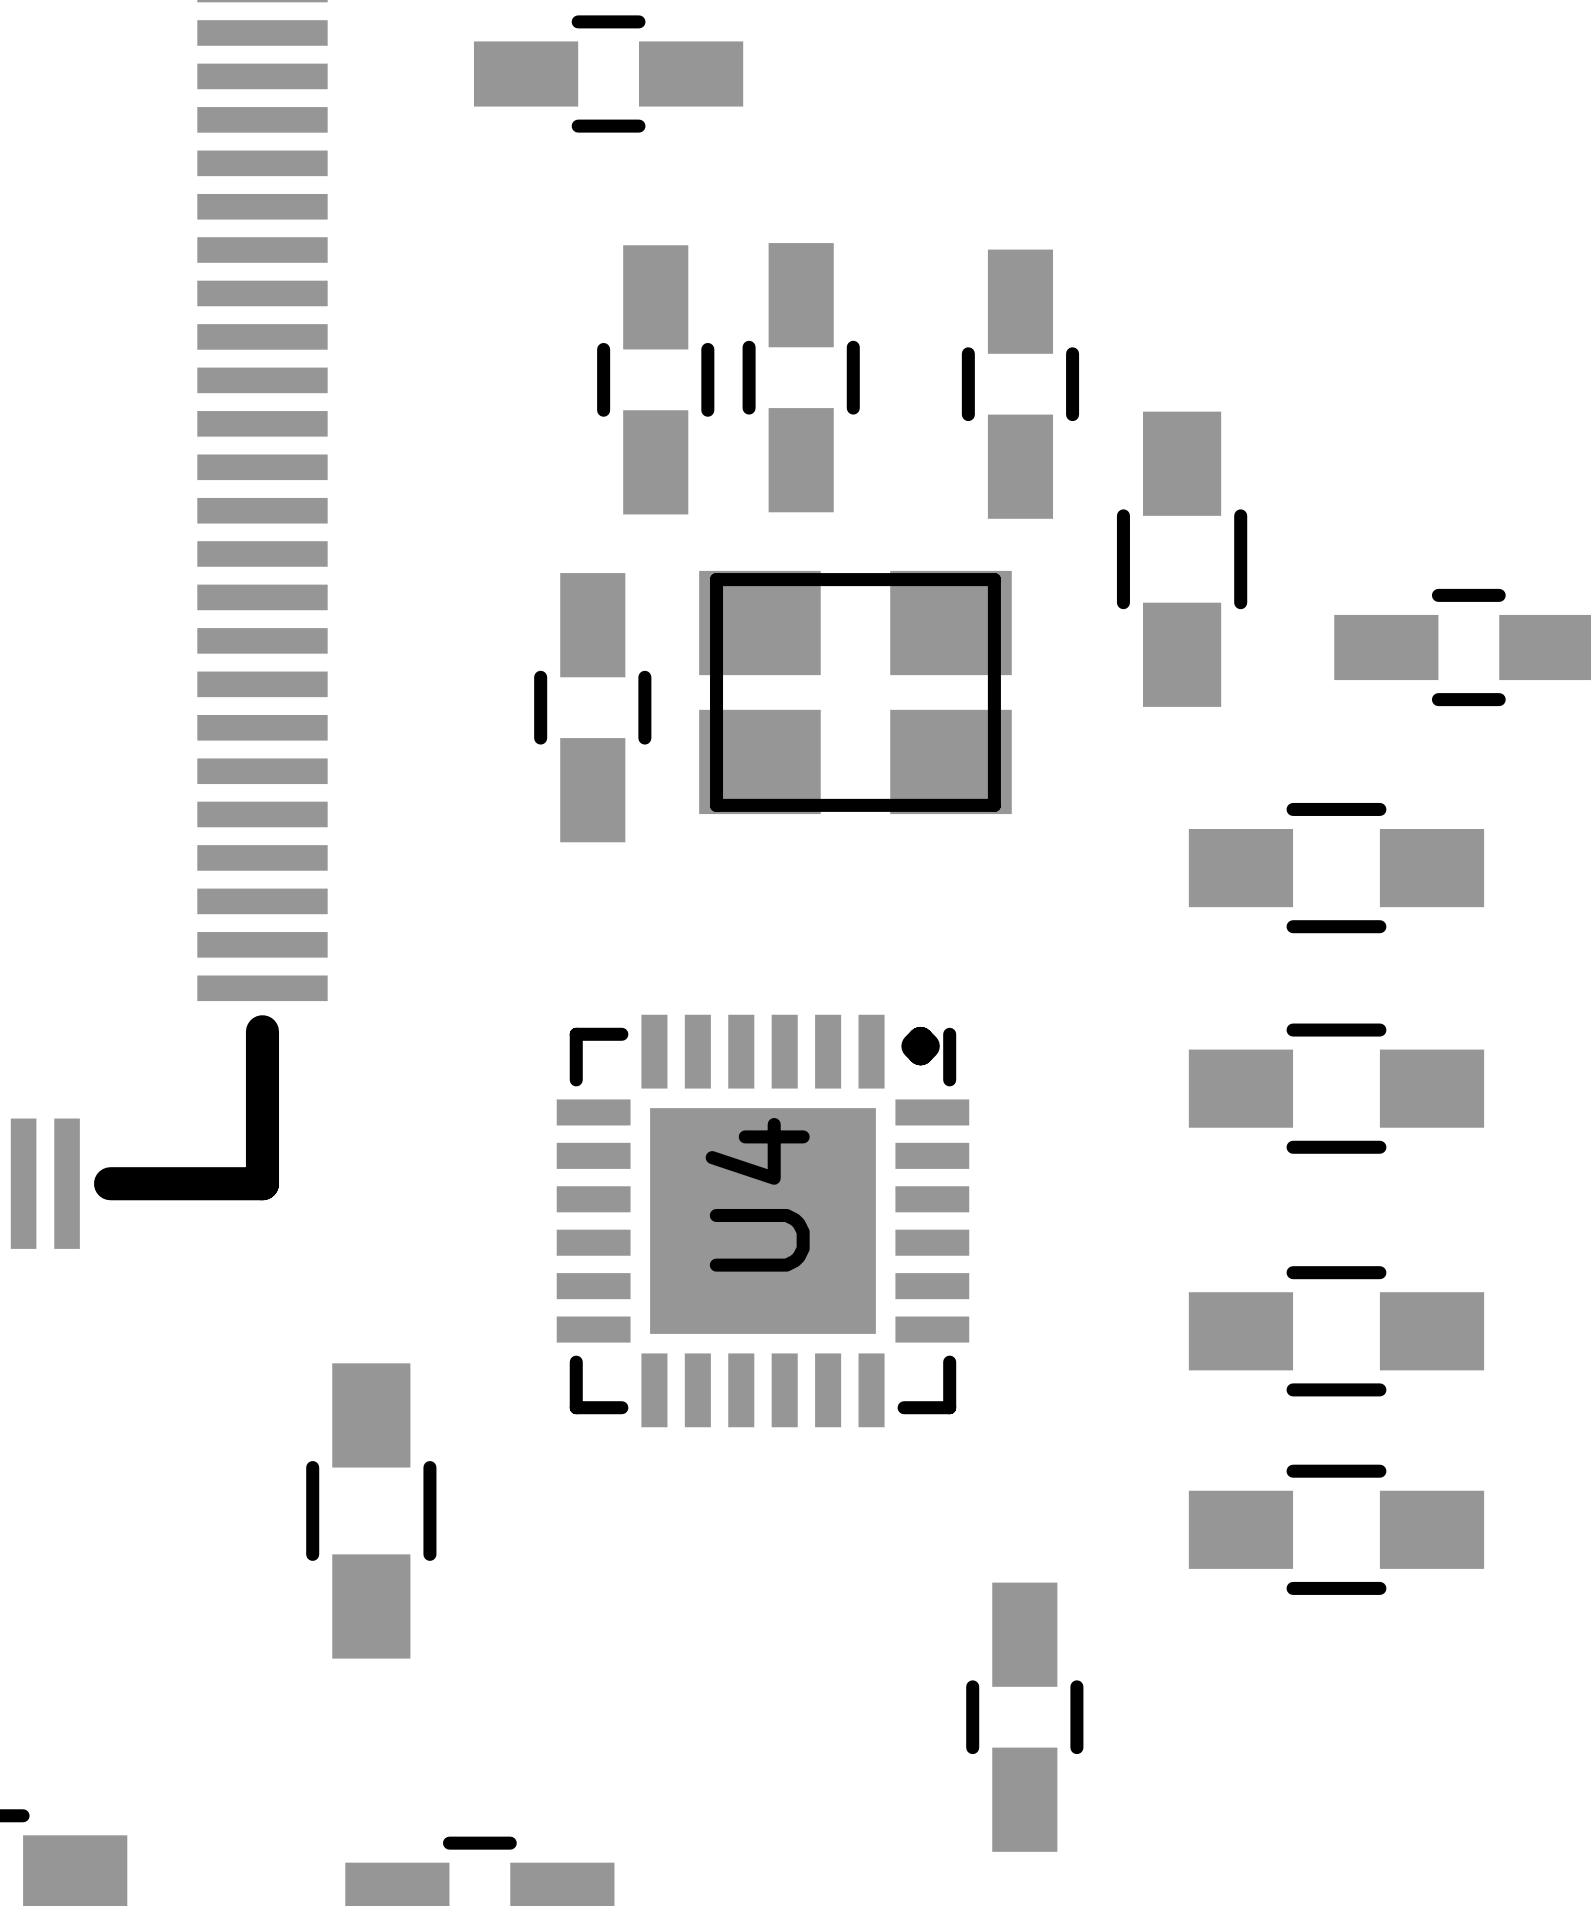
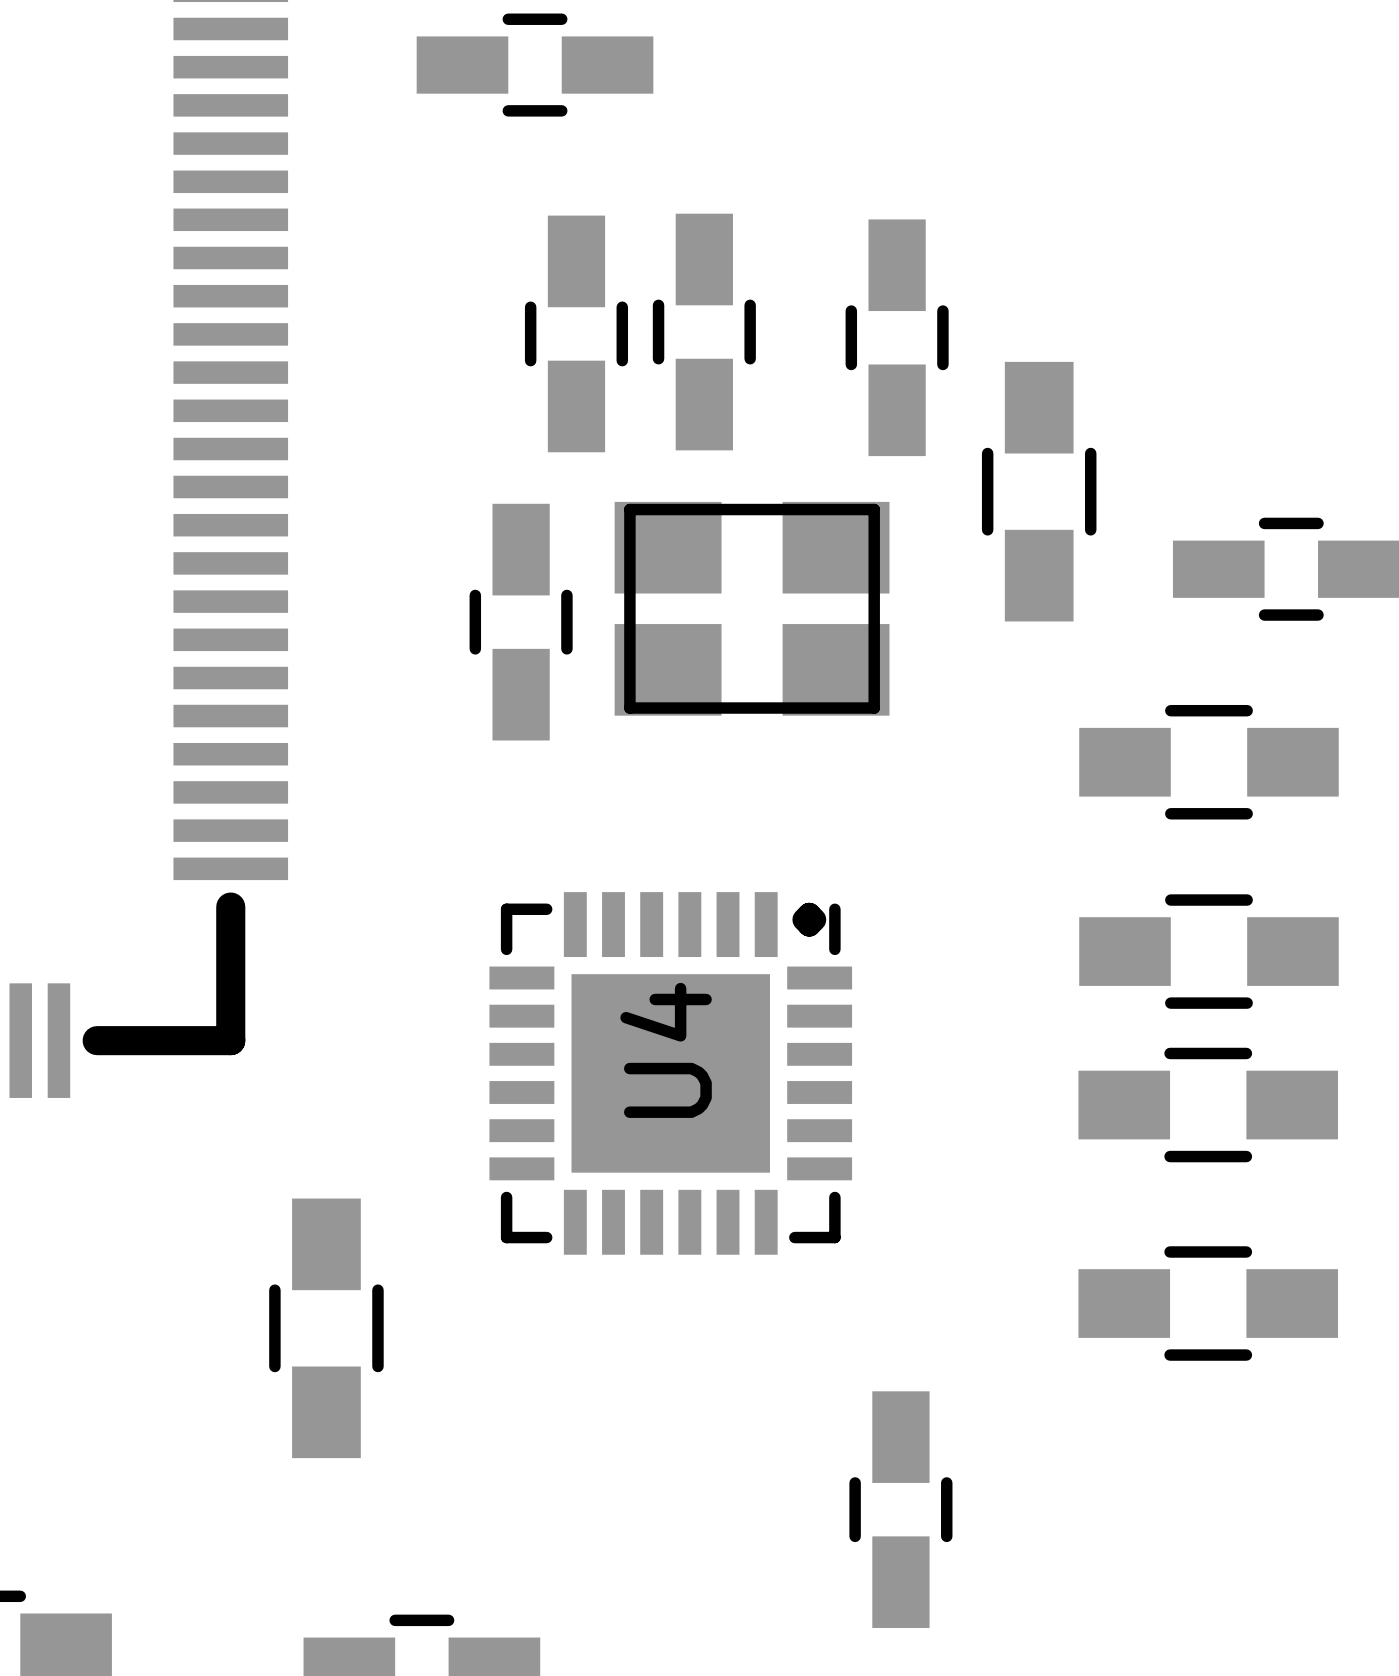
part position: (1336, 868) -> (1208, 762)
part position: (1336, 1088) -> (1208, 951)
part position: (1336, 1331) -> (1208, 1105)
part position: (1336, 1529) -> (1208, 1303)

